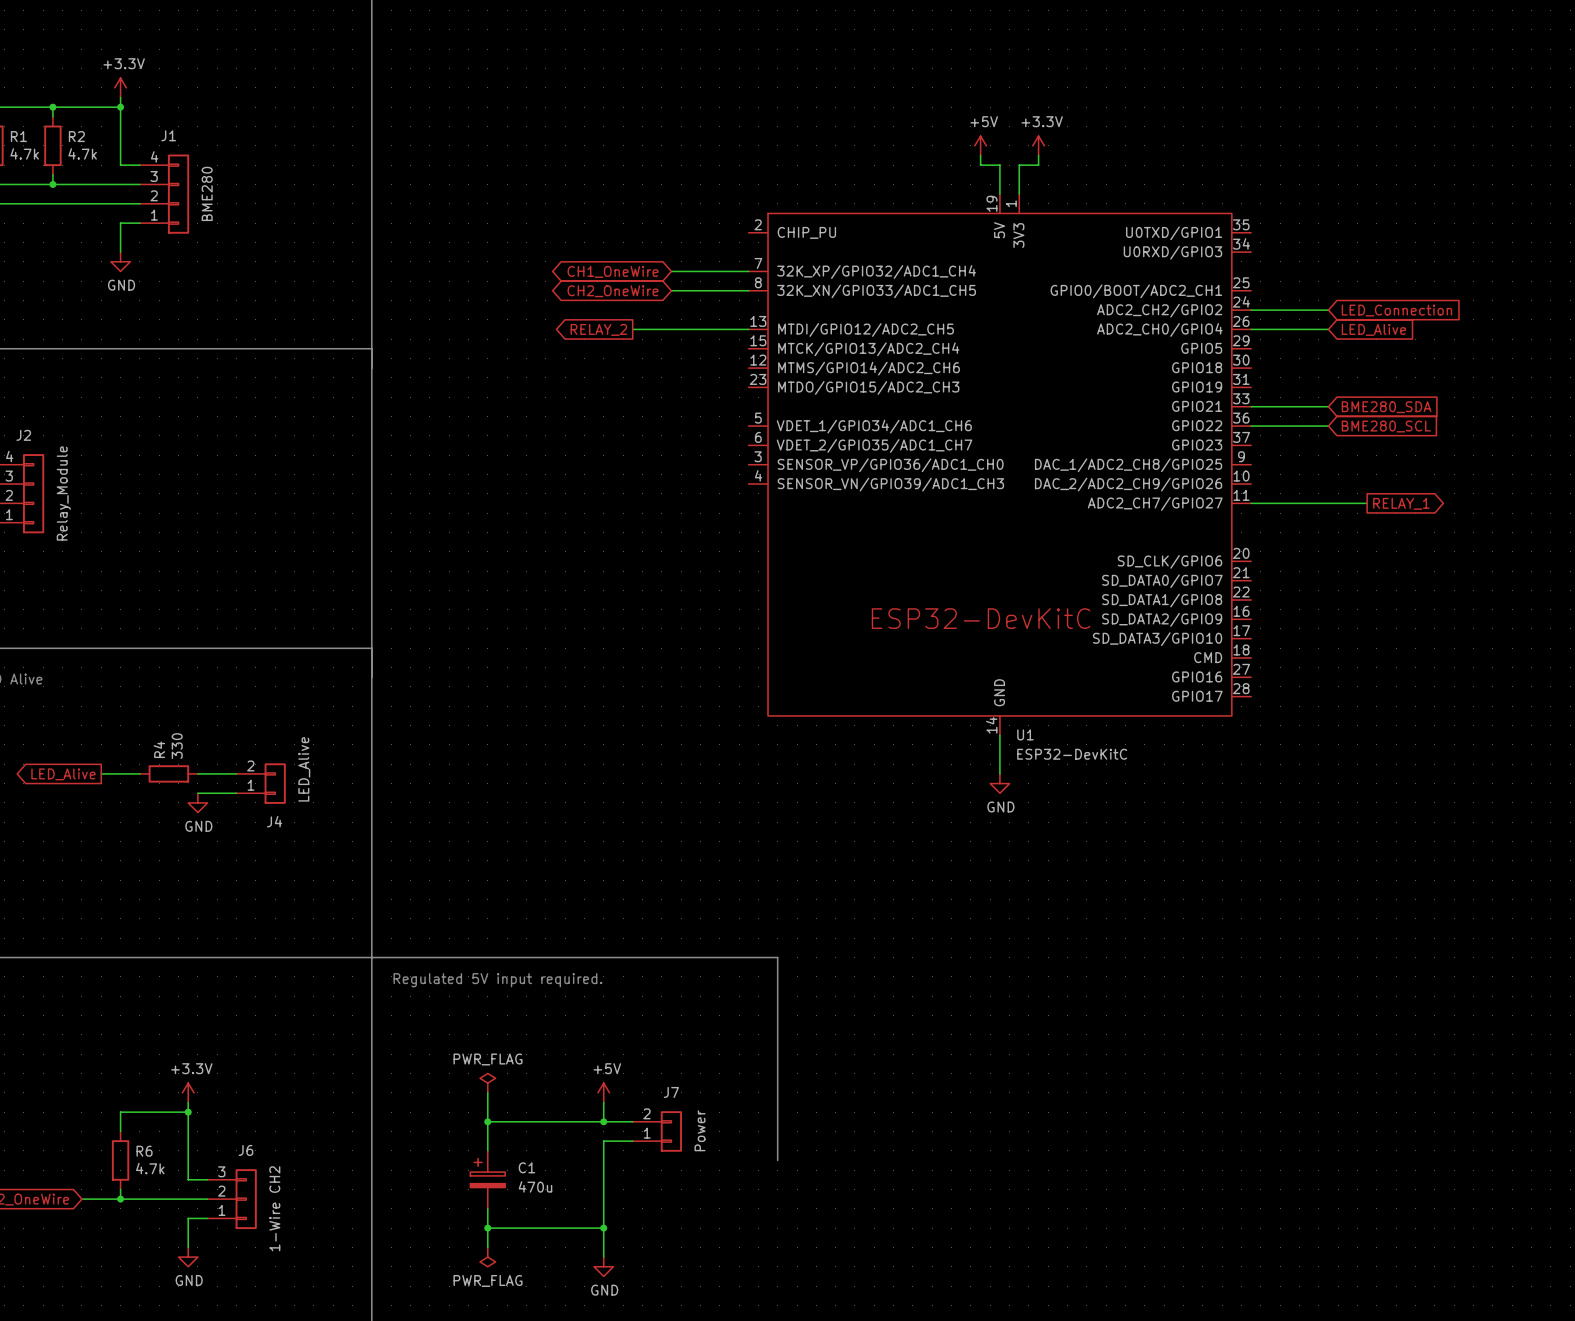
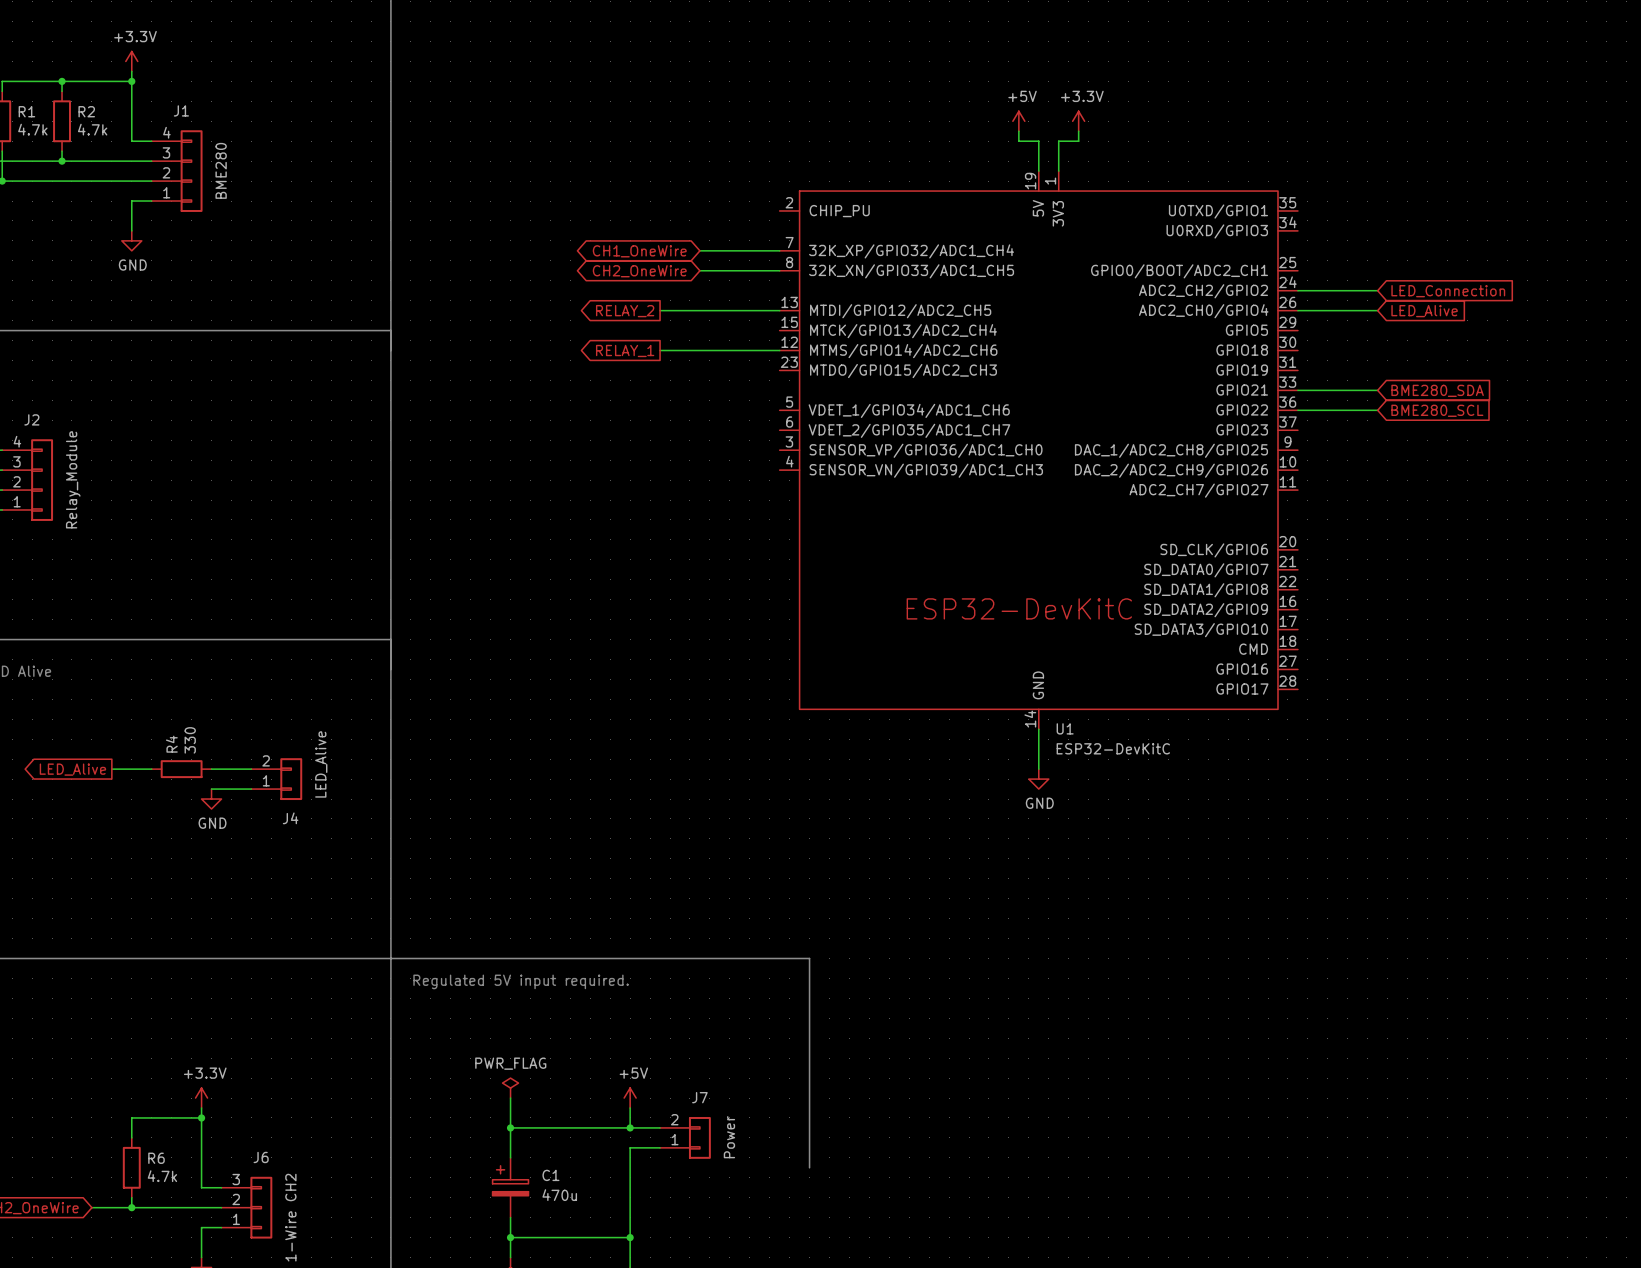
global label: none -> RELAY_1 (625, 350)
wire: none -> (660, 350) (779, 350)
wire: (1251, 503) (1367, 503) -> none
global label: RELAY_1 (1401, 503) -> none

